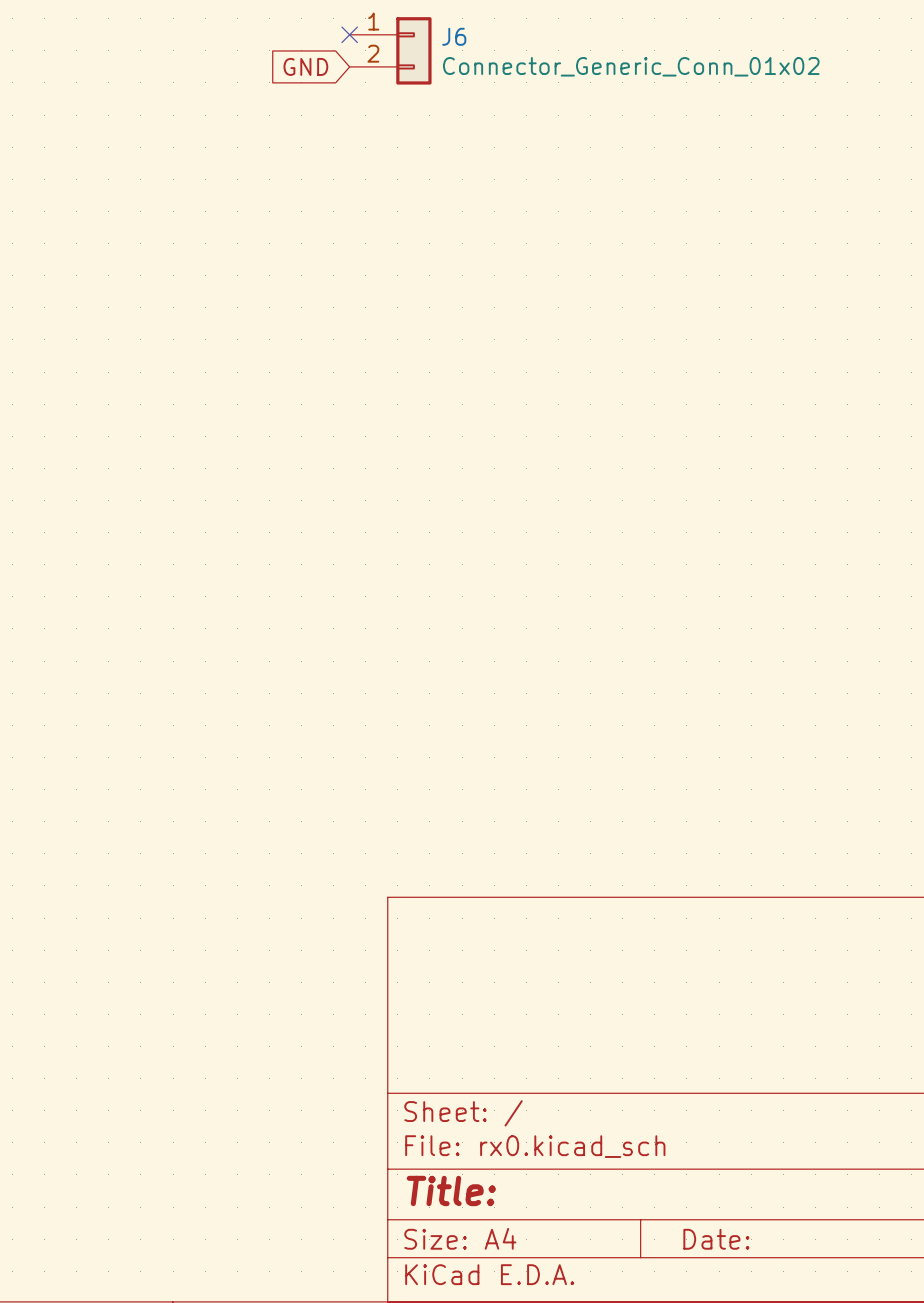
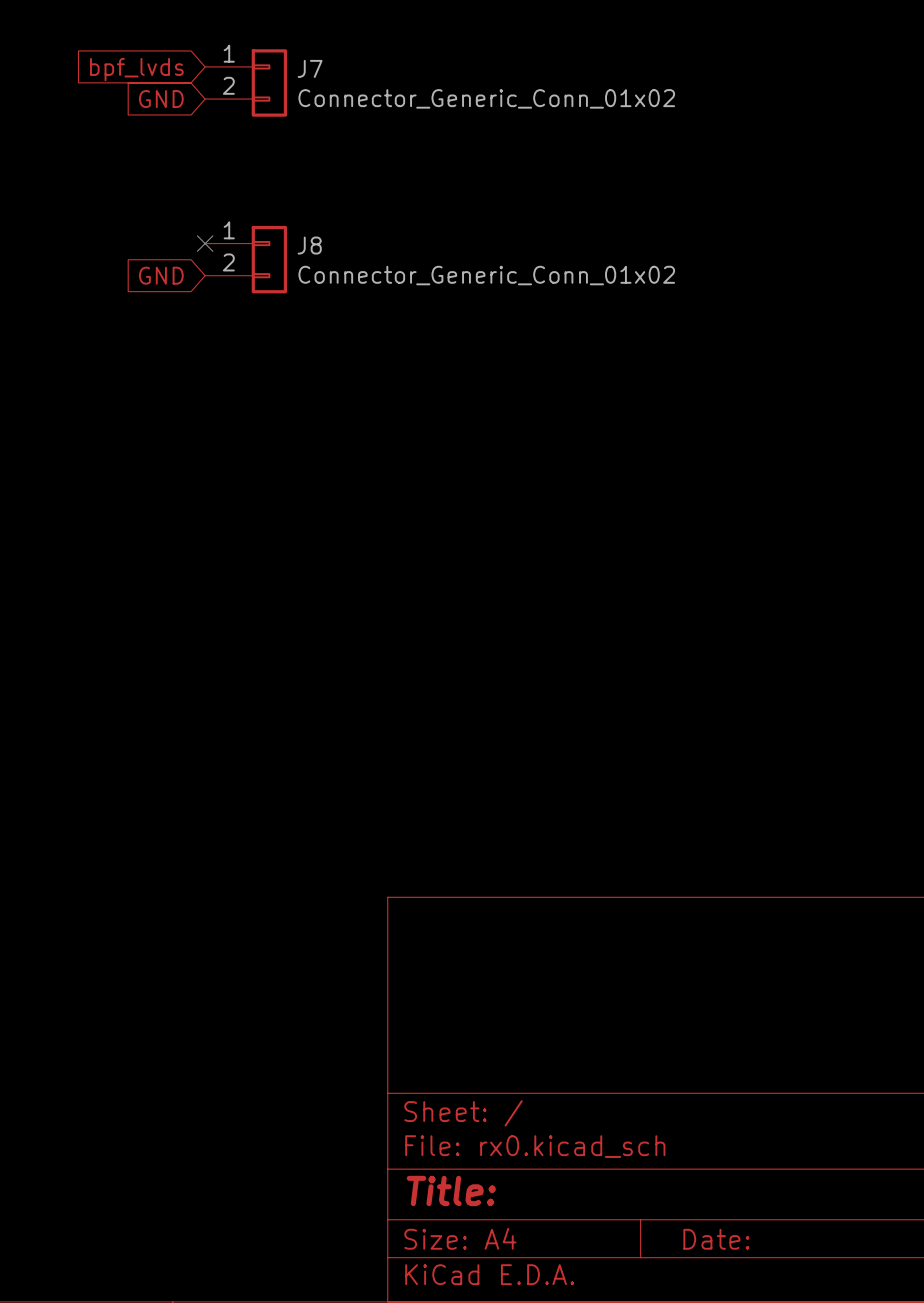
no-connect mark: (349, 34) -> none
J6: Connector_Generic_Conn_01x02 (390, 50) -> none
global label: GND (305, 66) -> none
global label: none -> bpf_lvds (136, 69)
J7: none -> Connector_Generic_Conn_01x02 (246, 82)
global label: none -> GND (161, 99)
no-connect mark: none -> (205, 243)
J8: none -> Connector_Generic_Conn_01x02 (246, 259)
global label: none -> GND (161, 275)

